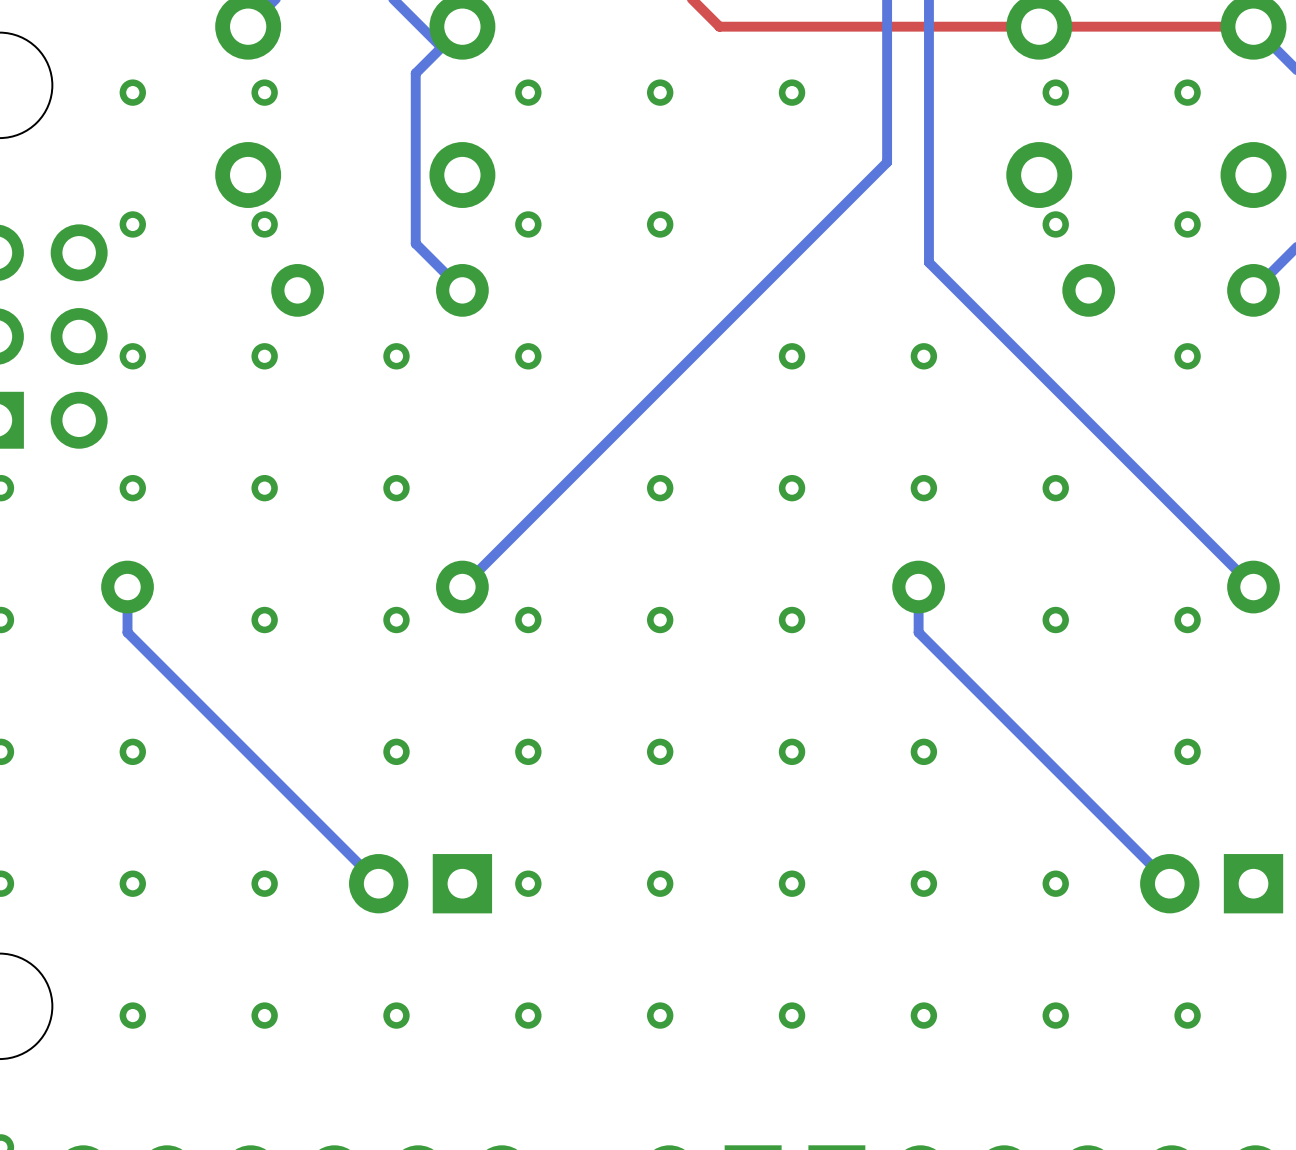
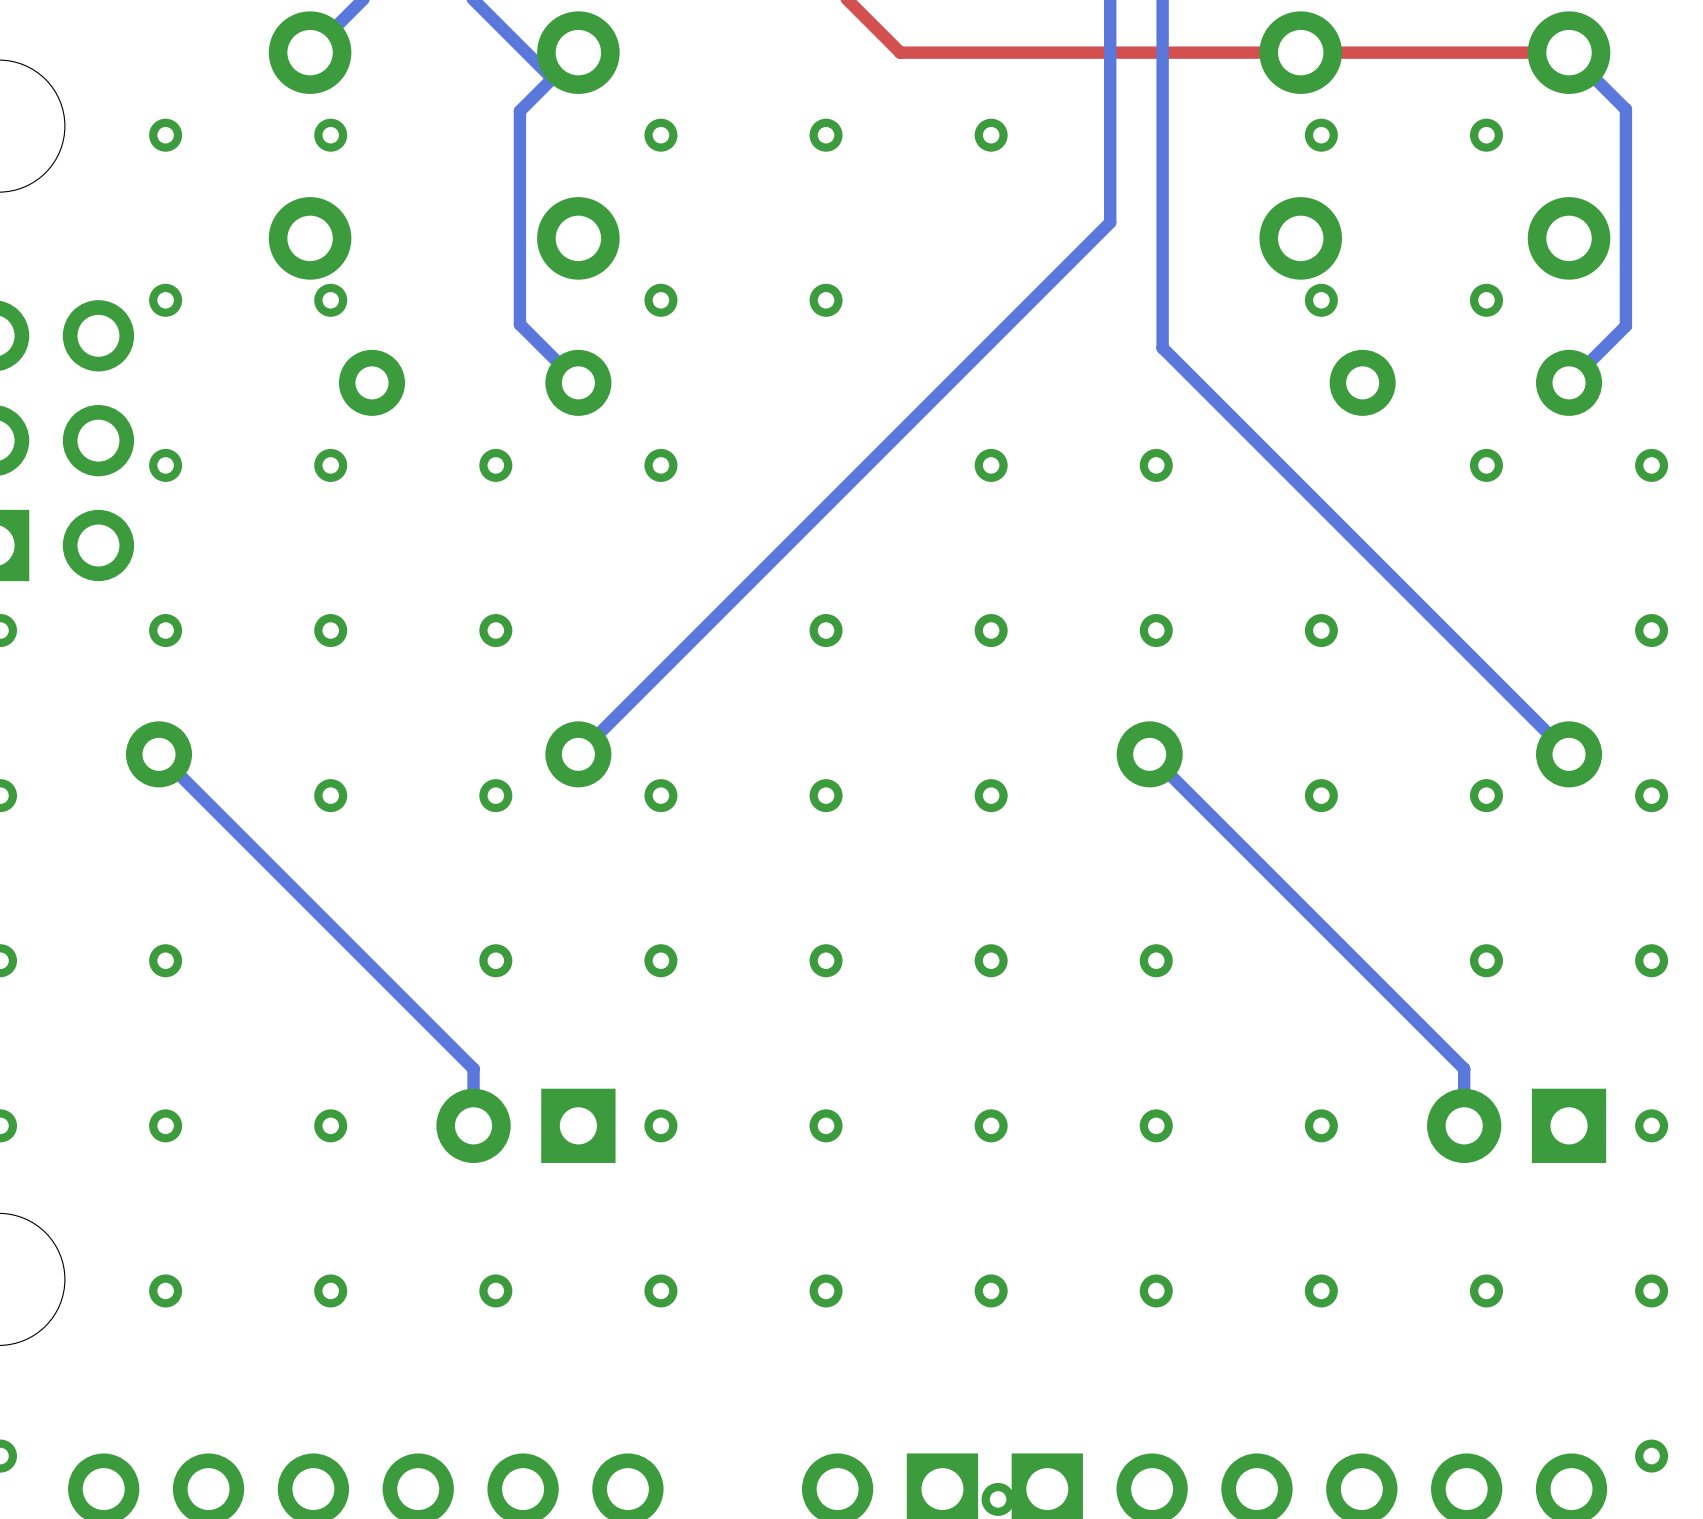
bottom track: (127, 587) (127, 632) (378, 883) -> (159, 754) (473, 1068) (473, 1125)
bottom track: (918, 587) (918, 632) (1169, 883) -> (1149, 754) (1464, 1068) (1464, 1125)

